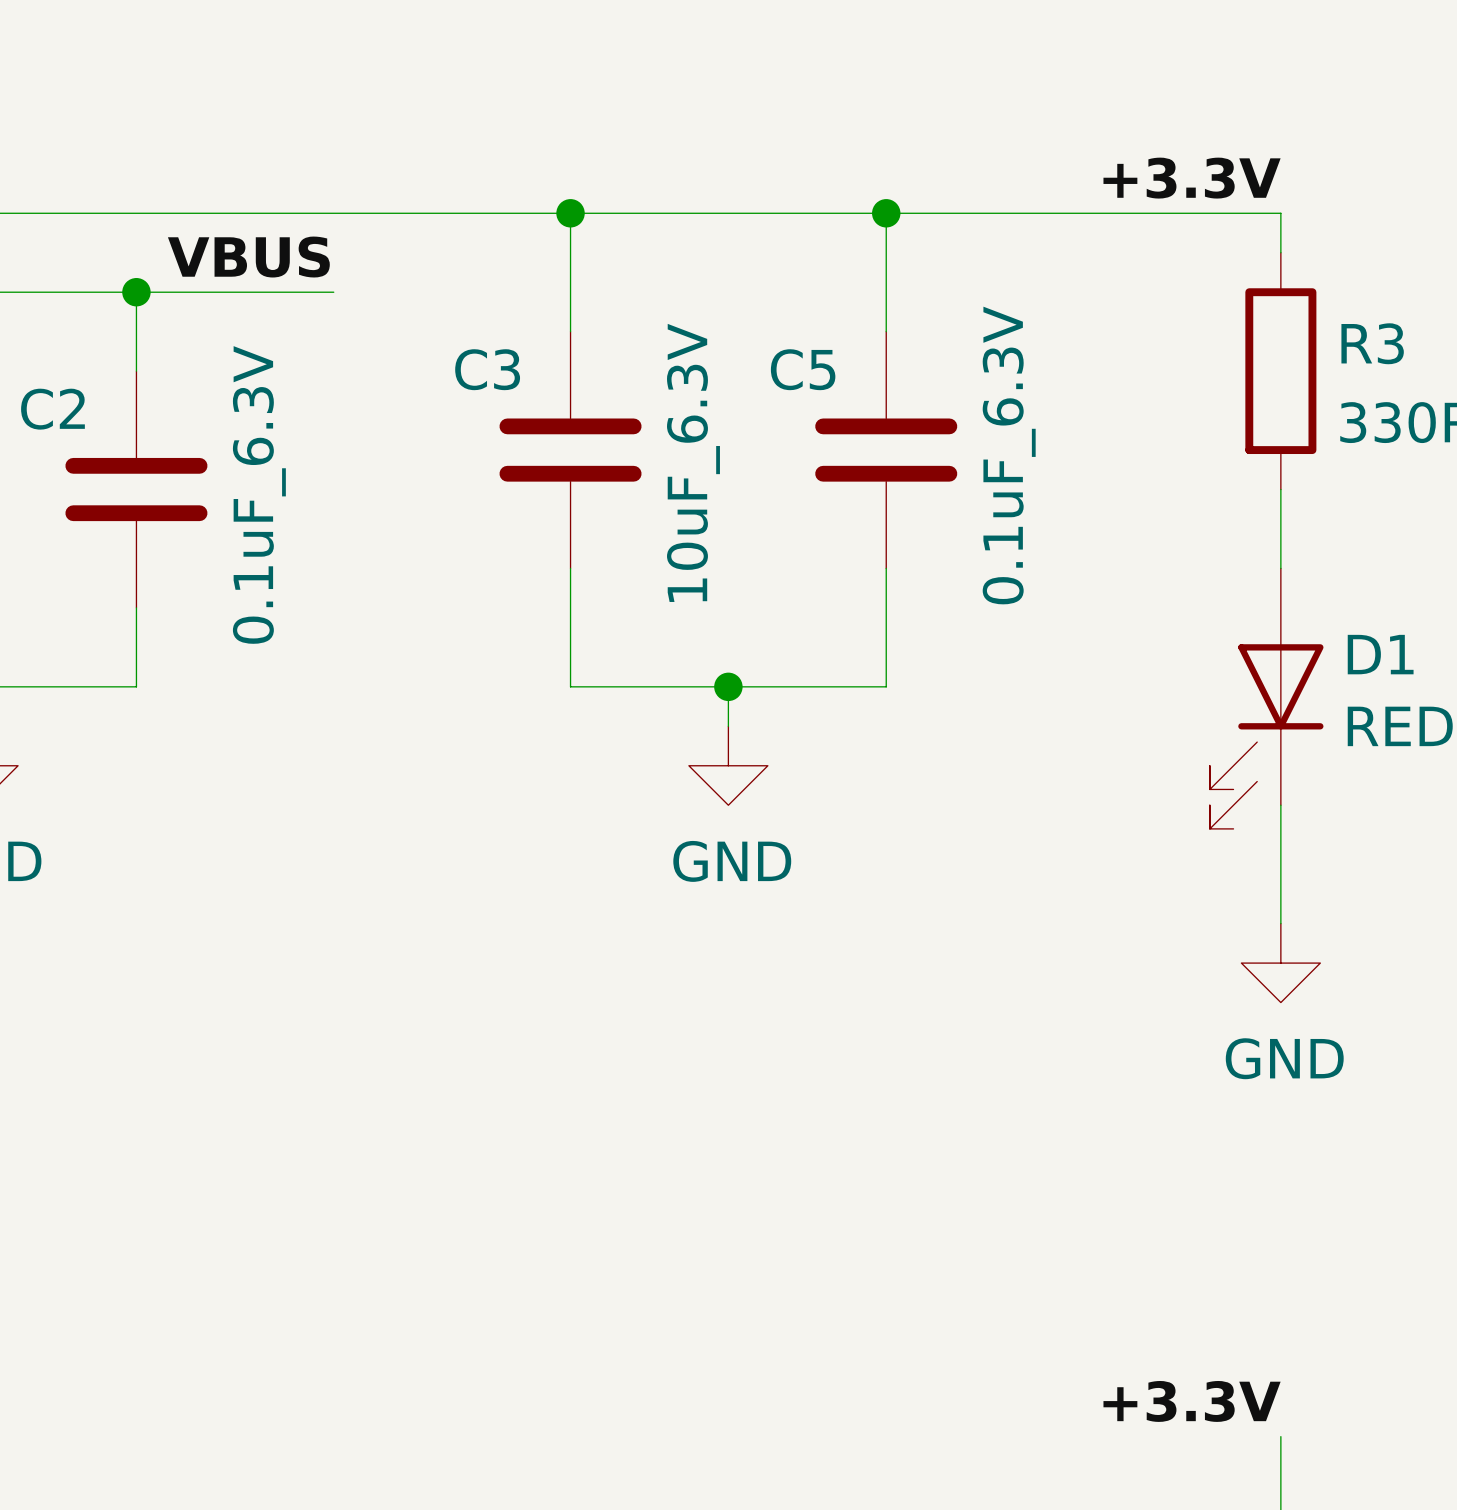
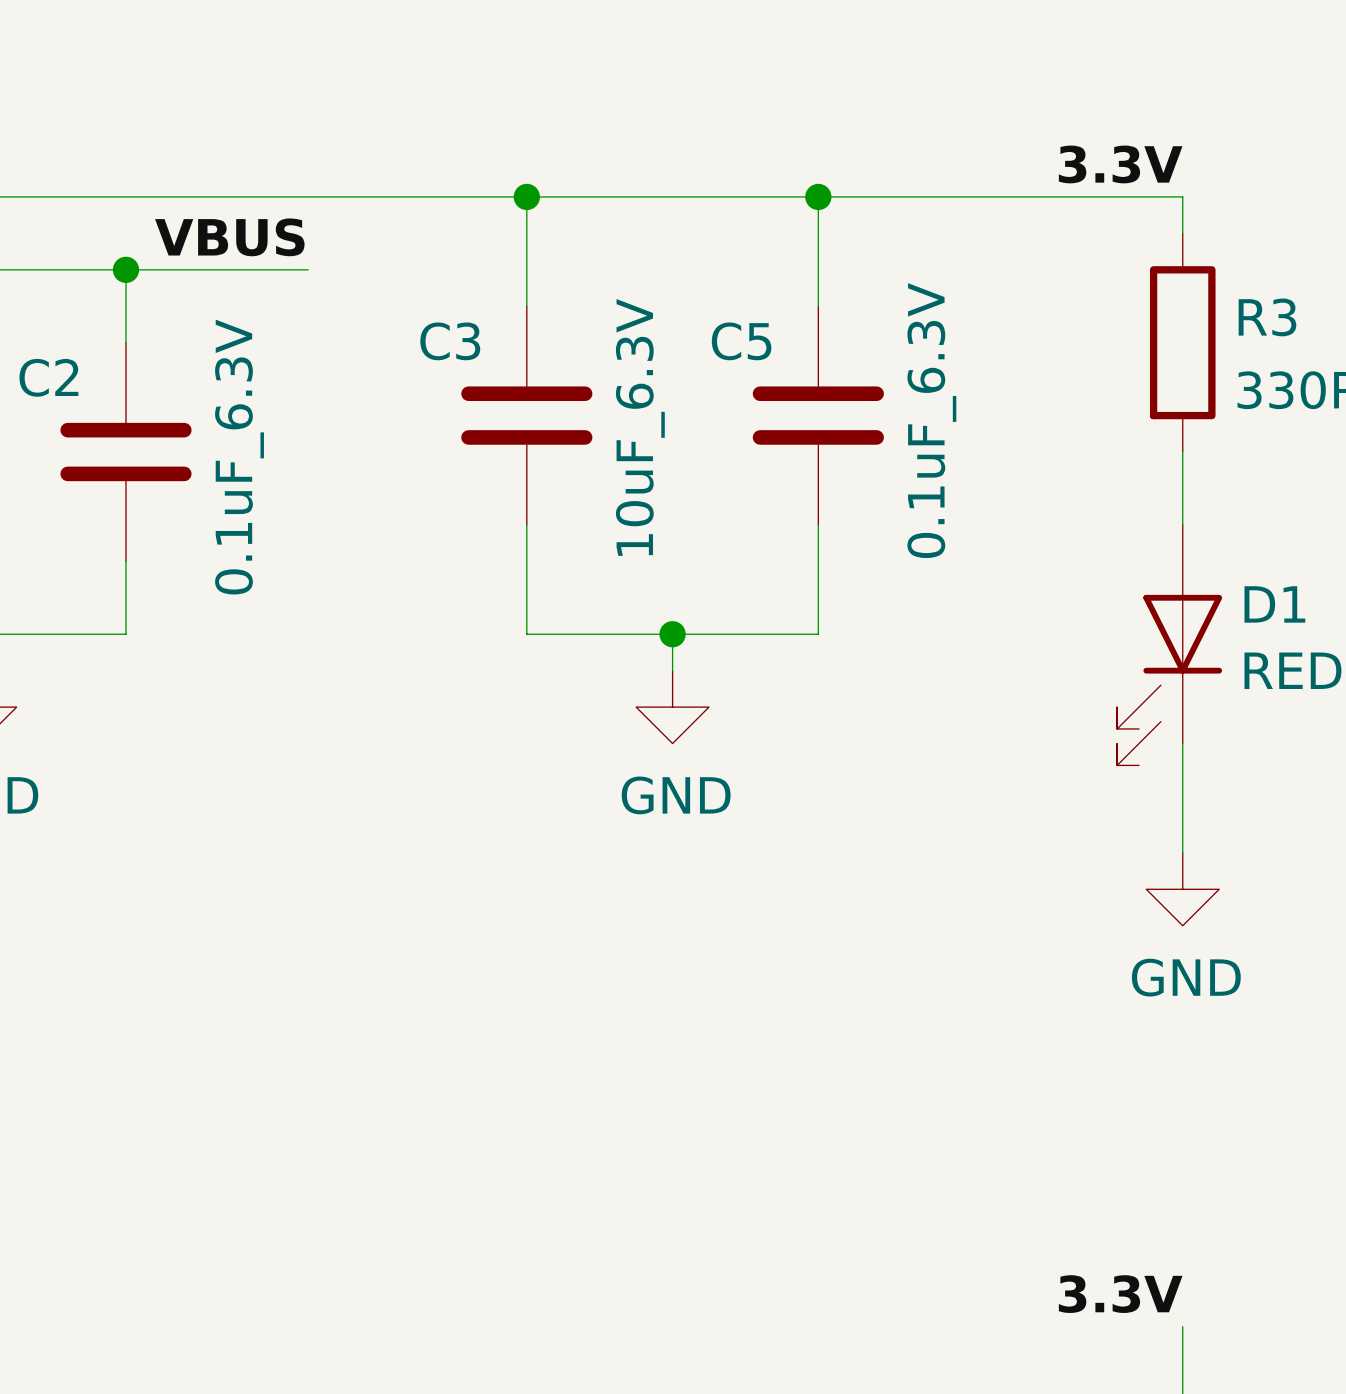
label: +3.3V (1192, 178) -> 3.3V (1120, 164)
label: +3.3V (1192, 1401) -> 3.3V (1120, 1294)

